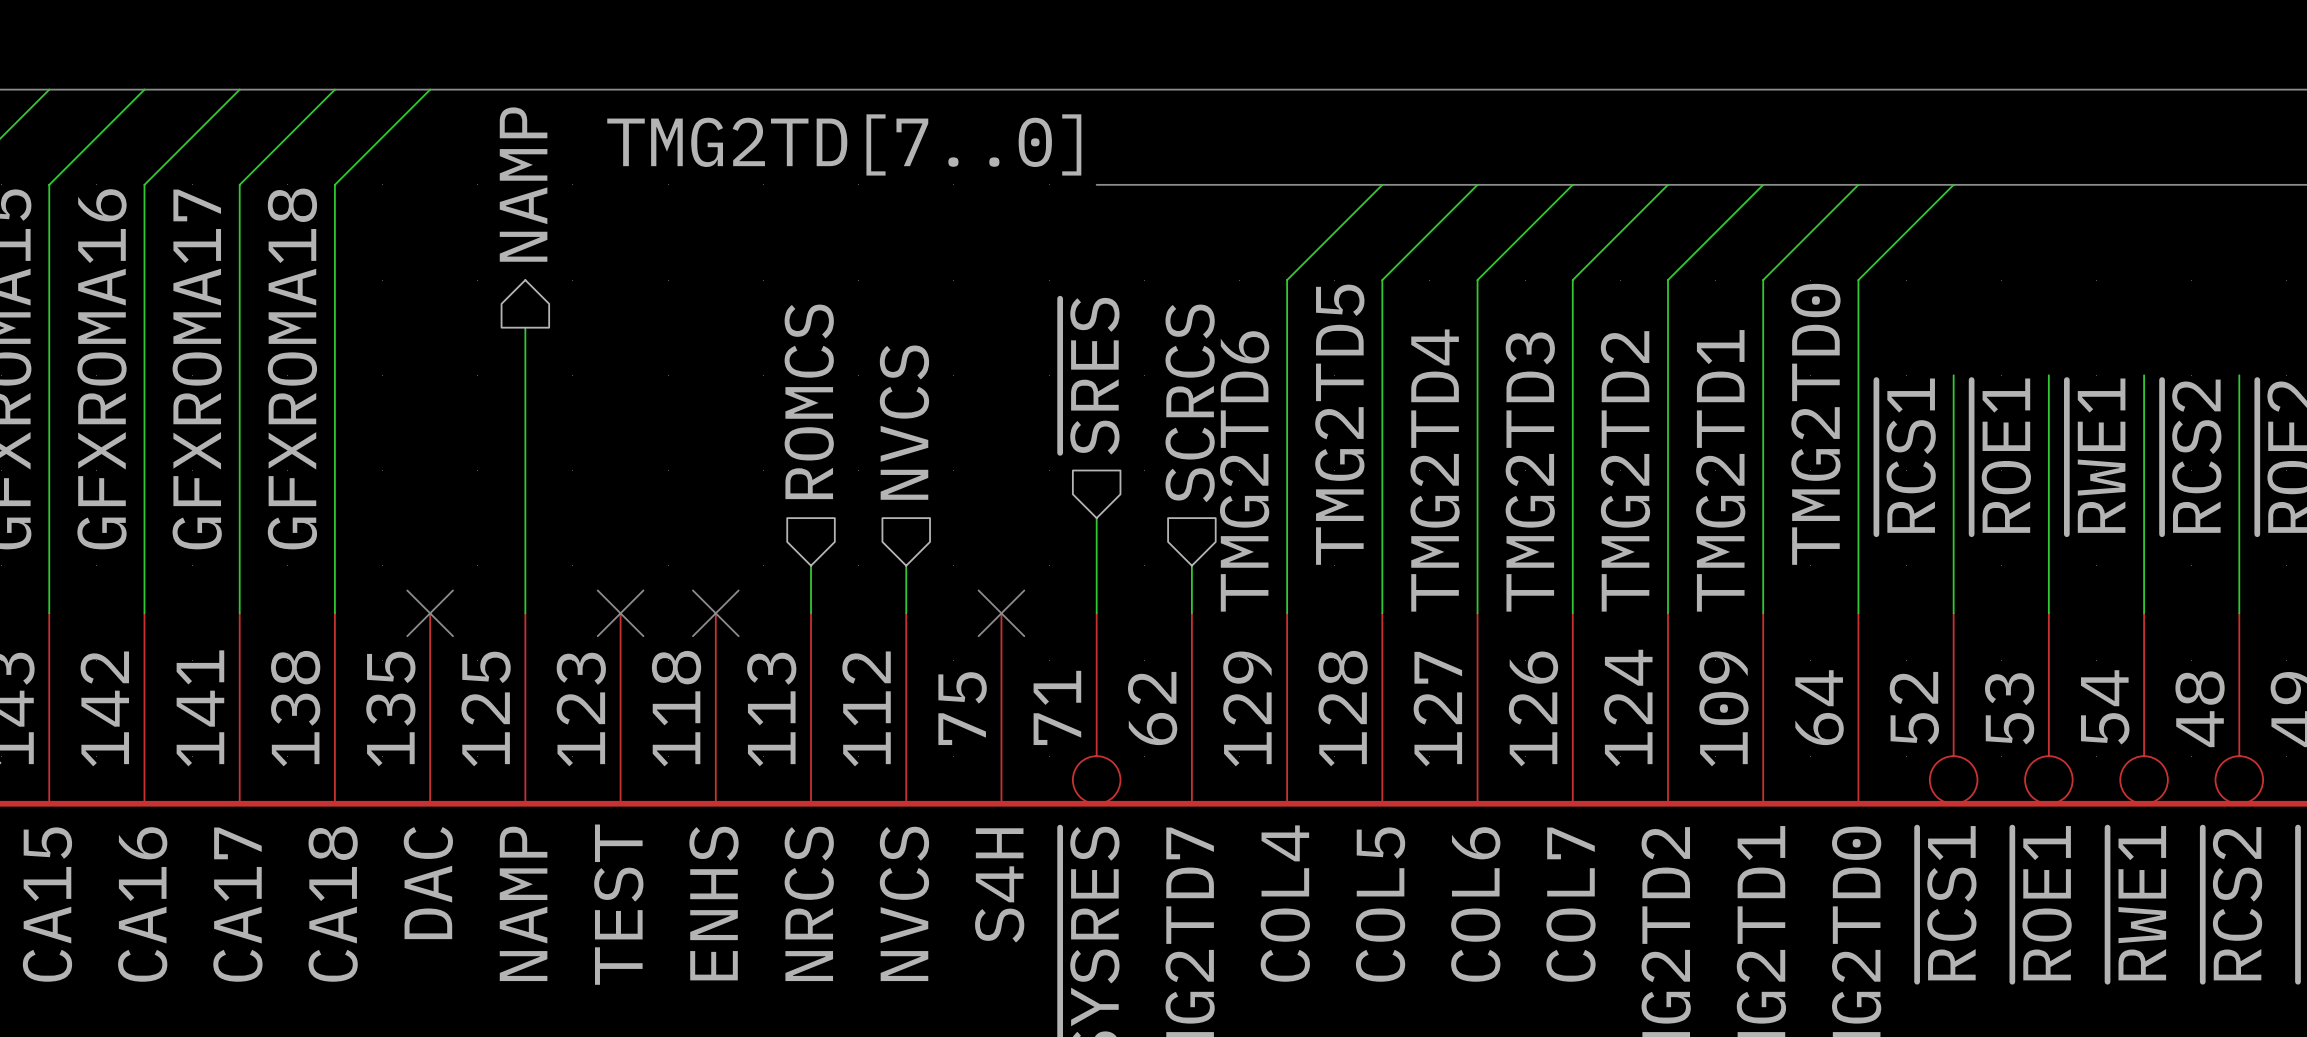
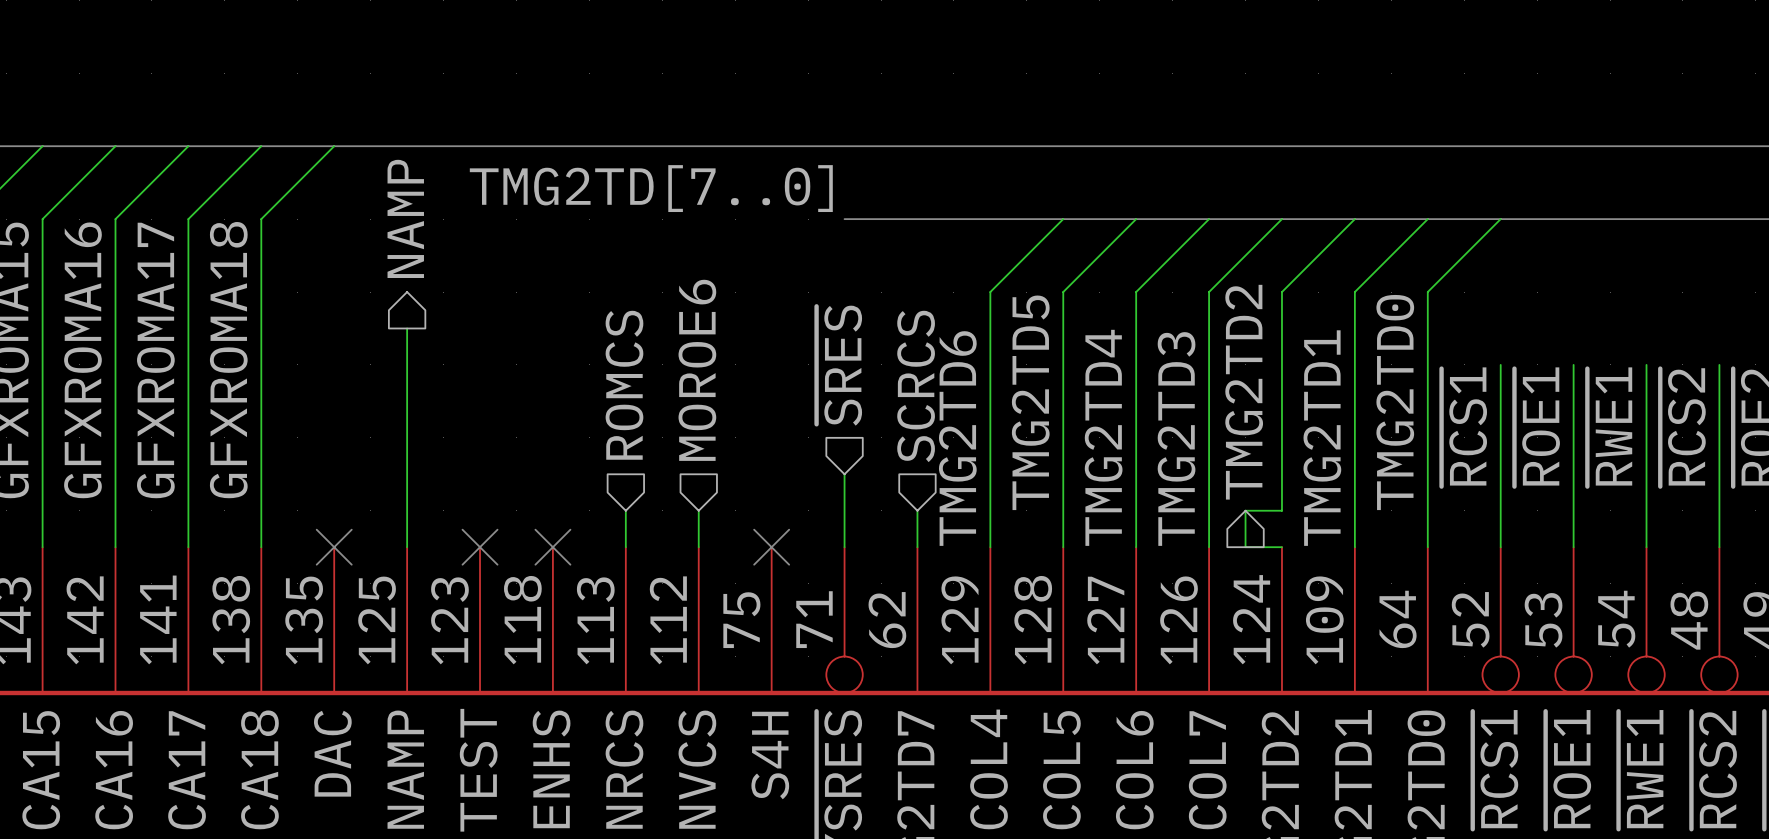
hierarchical label: none -> TMG2TD2 (1244, 392)
hierarchical label: NVCS (904, 422) -> MOROE6 (697, 370)
label: TMG2TD2 (1625, 471) -> none
wire: (1667, 565) (1667, 613) -> (1281, 510) (1245, 510) (1245, 547) (1281, 547)

